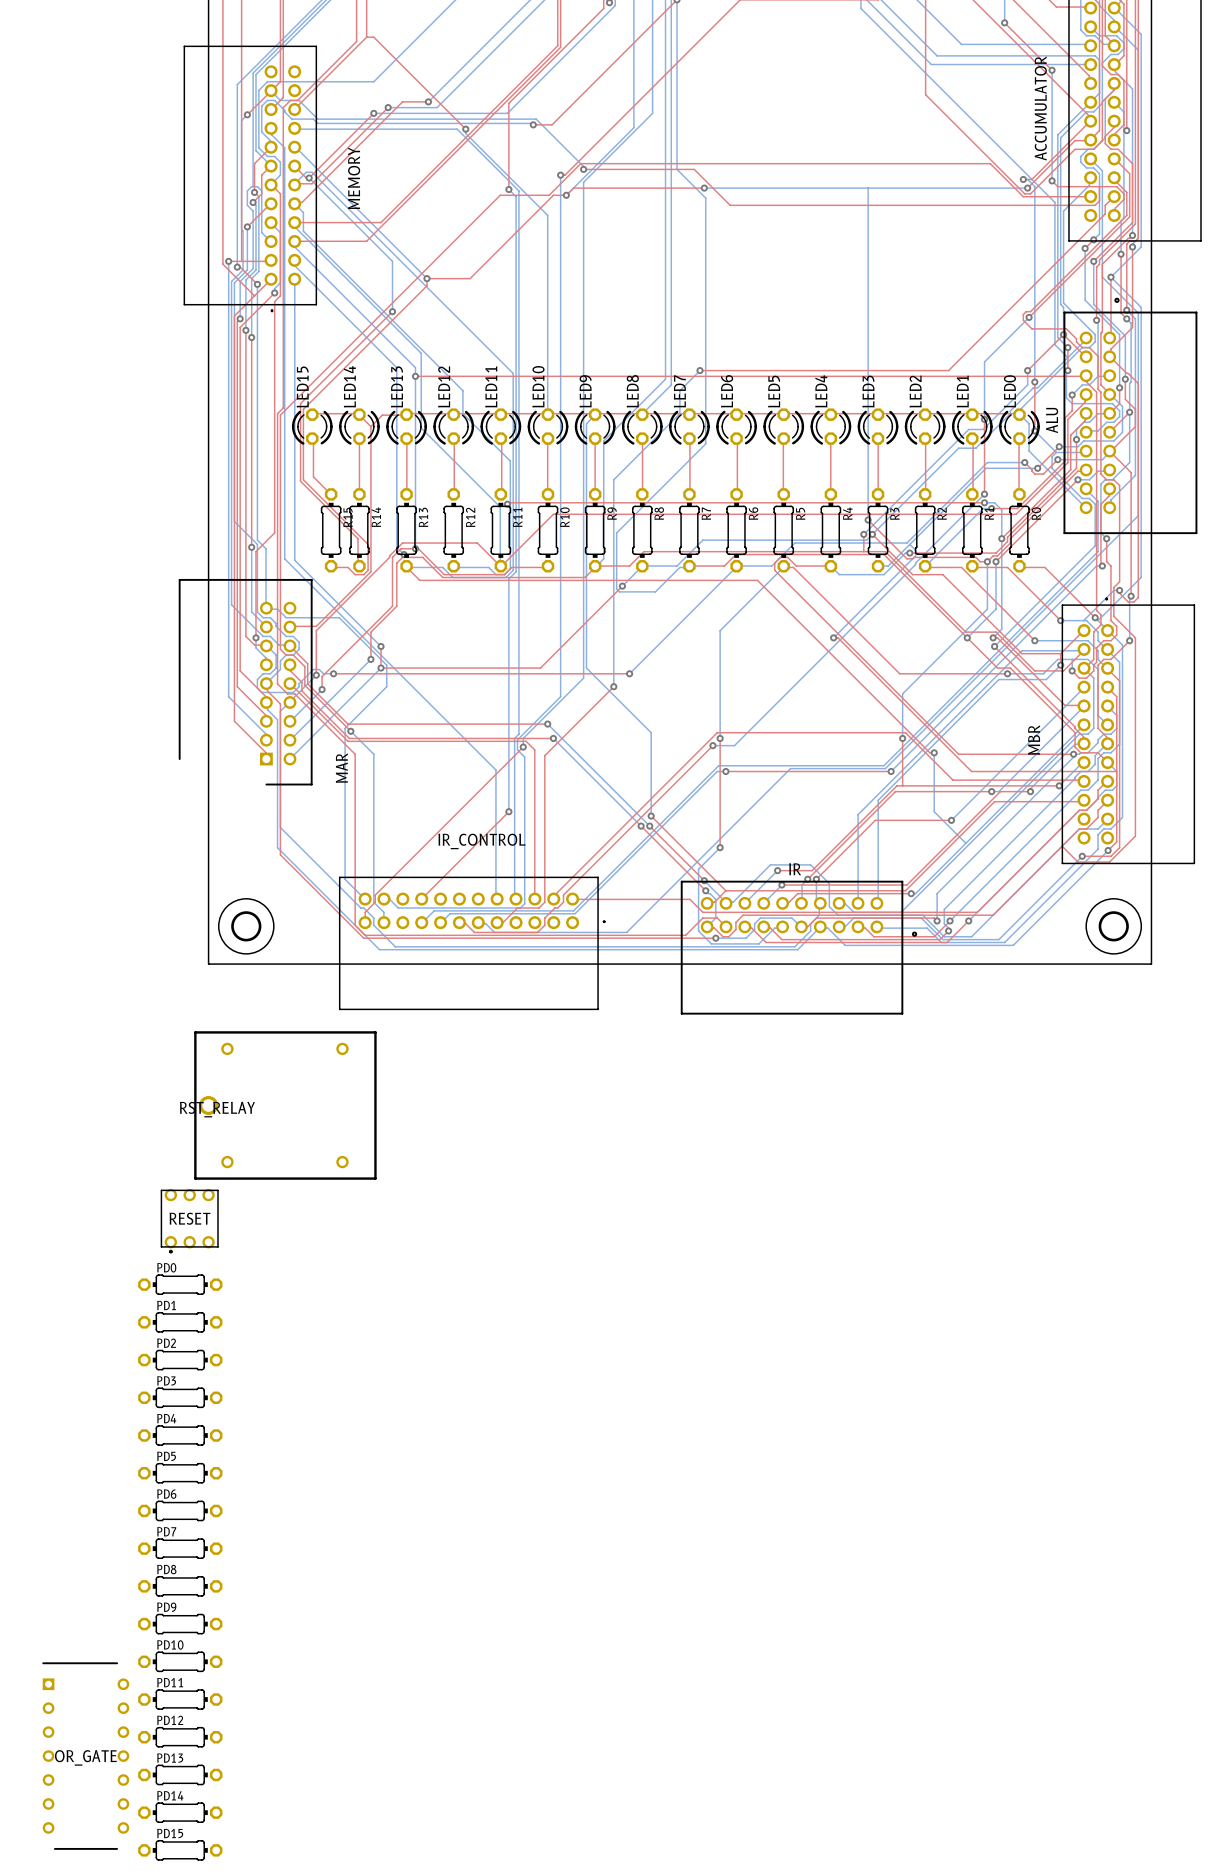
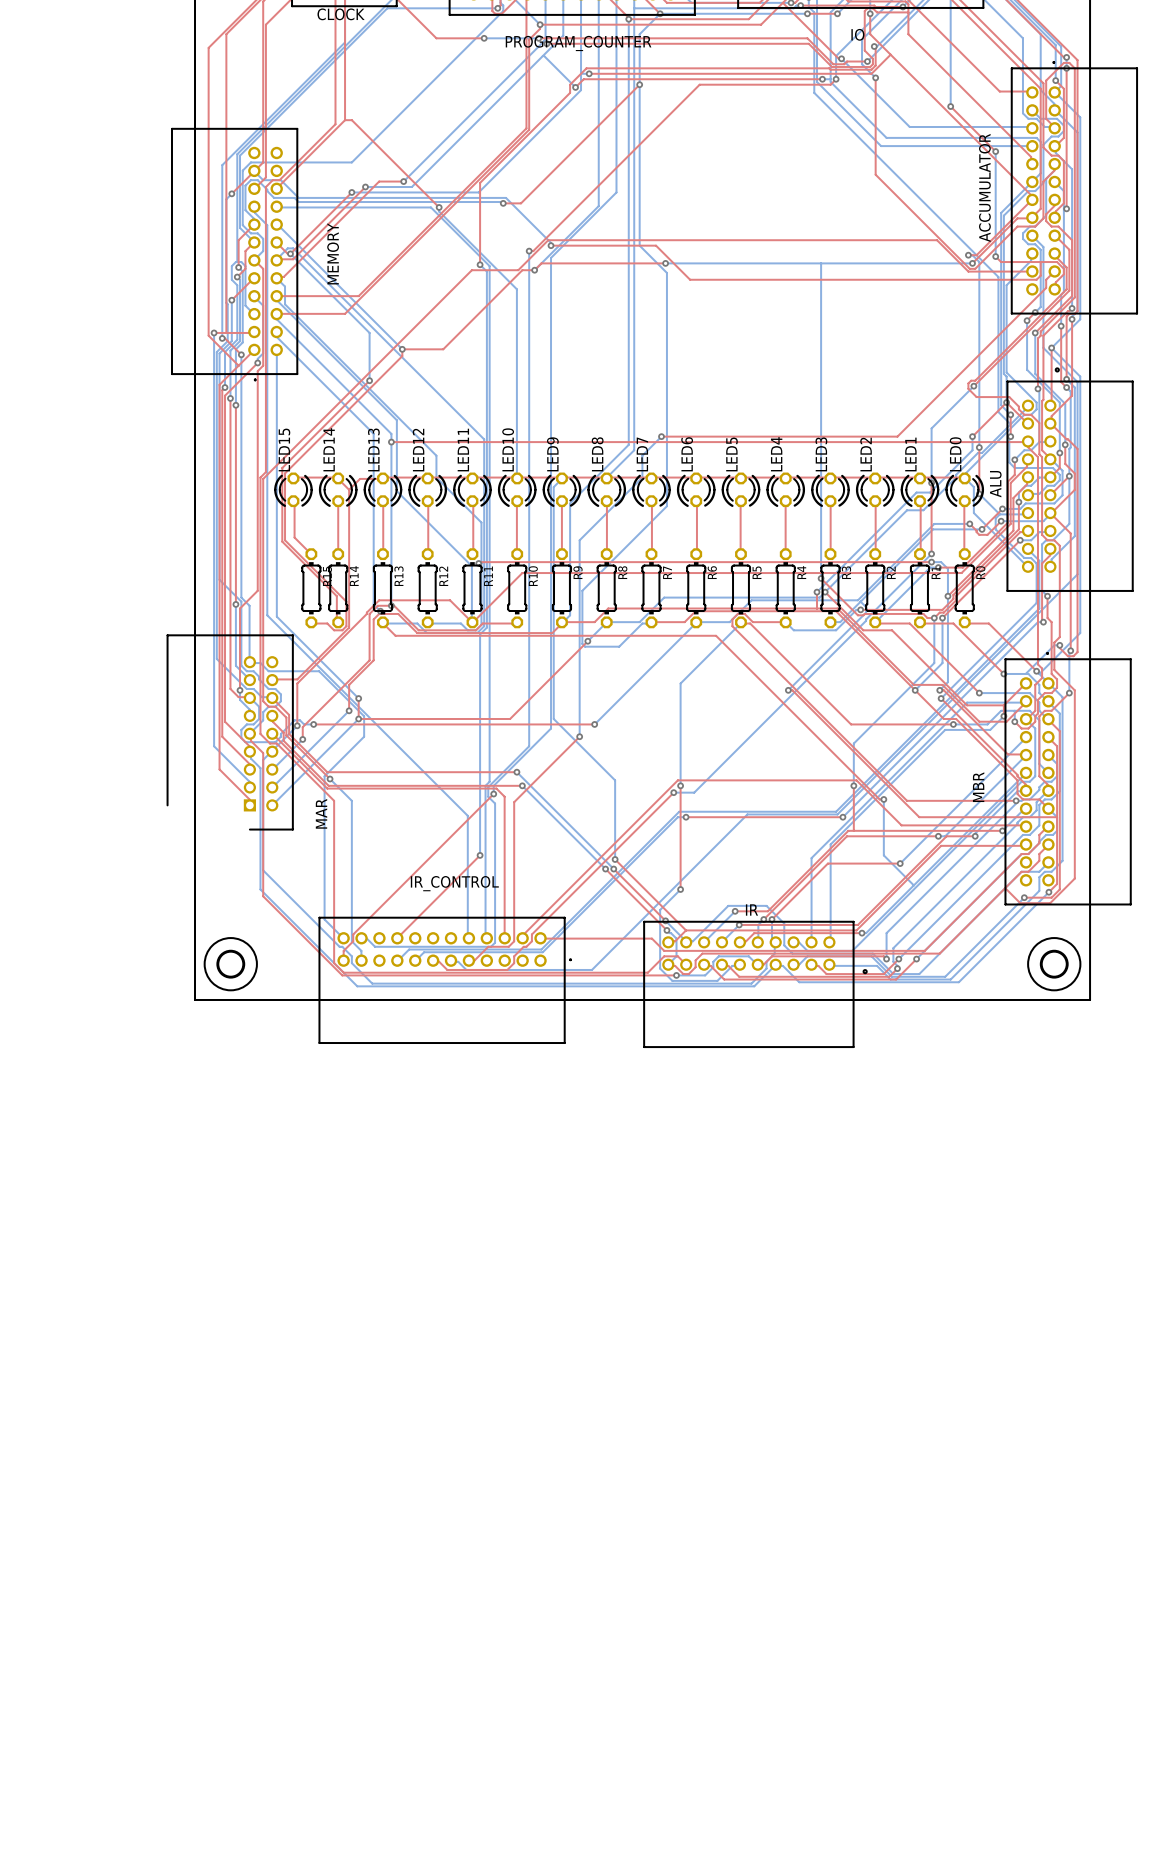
RST_RELAY: (285, 1105) -> none
RESET: (189, 1221) -> none
PD0: (180, 1284) -> none
PD1: (180, 1322) -> none
PD2: (180, 1360) -> none
PD3: (180, 1397) -> none
PD4: (180, 1435) -> none
PD5: (180, 1473) -> none
PD6: (180, 1510) -> none
PD7: (180, 1548) -> none
PD8: (180, 1586) -> none
PD9: (180, 1624) -> none
PD10: (180, 1661) -> none
PD11: (180, 1699) -> none
PD12: (180, 1737) -> none
OR_GATE: (85, 1756) -> none
PD13: (180, 1774) -> none
PD14: (180, 1812) -> none
PD15: (180, 1850) -> none

